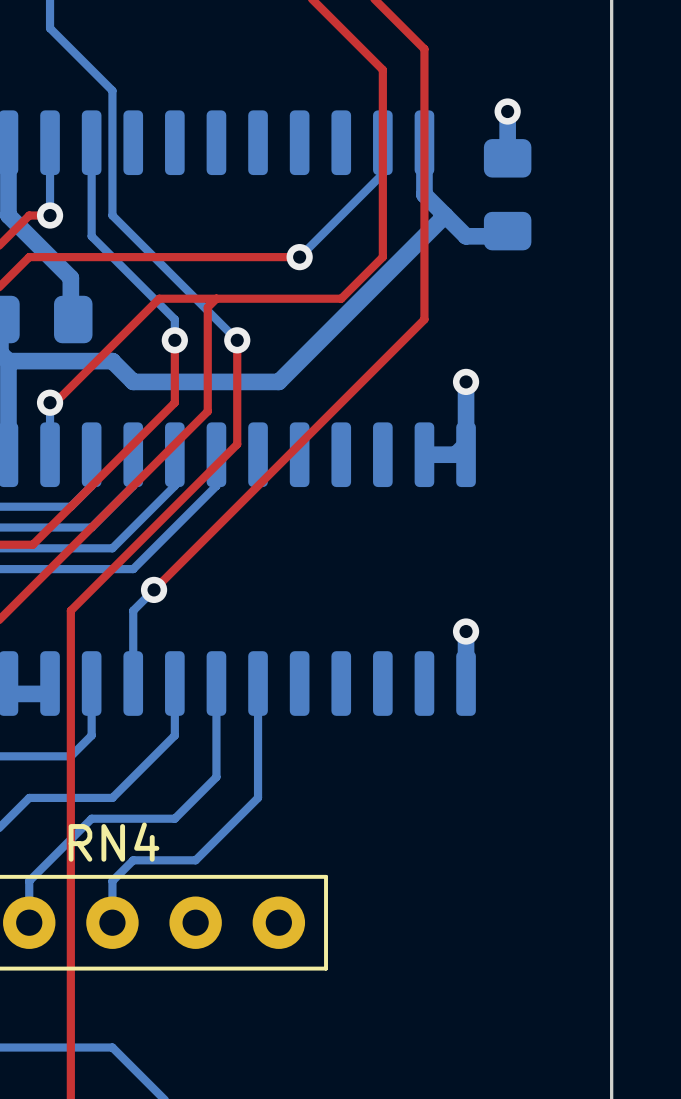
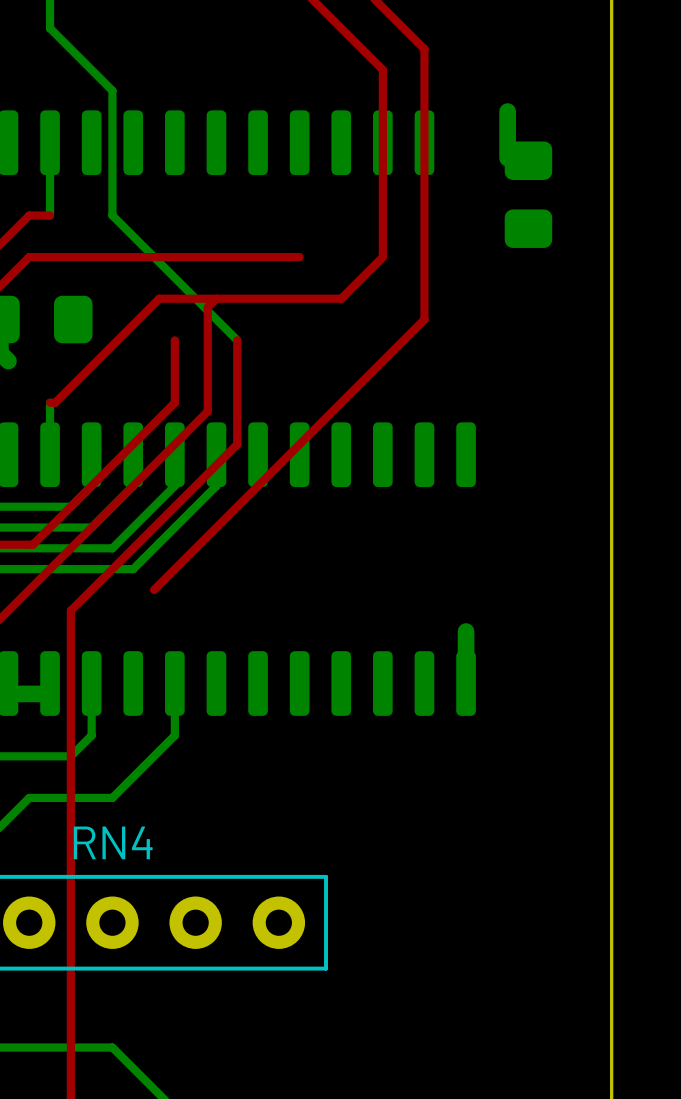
via: (507, 111) -> none
part footprint: [483, 139, 532, 251] -> [504, 141, 553, 248]
bottom track: (8, 141) (8, 215) (70, 277) (70, 319) -> none
bottom track: (91, 142) (91, 236) (174, 319) (174, 340) -> none
bottom track: (382, 142) (382, 173) (299, 257) -> none
bottom track: (424, 142) (424, 194) (466, 236) (507, 236) -> none
via: (50, 215) -> none
bottom track: (445, 215) (278, 381) (133, 381) (112, 361) (8, 361) (8, 444) -> none
via: (299, 257) -> none
via: (174, 340) -> none
via: (237, 340) -> none
bottom track: (466, 381) (466, 444) (455, 454) (424, 454) -> none
via: (466, 381) -> none
via: (50, 402) -> none
bottom track: (154, 589) (133, 610) (133, 673) -> none
via: (154, 589) -> none
via: (466, 631) -> none
bottom track: (216, 683) (216, 777) (174, 818) (91, 818) (29, 881) (29, 922) -> none
bottom track: (258, 683) (258, 797) (195, 860) (133, 860) (112, 881) (112, 922) -> none

